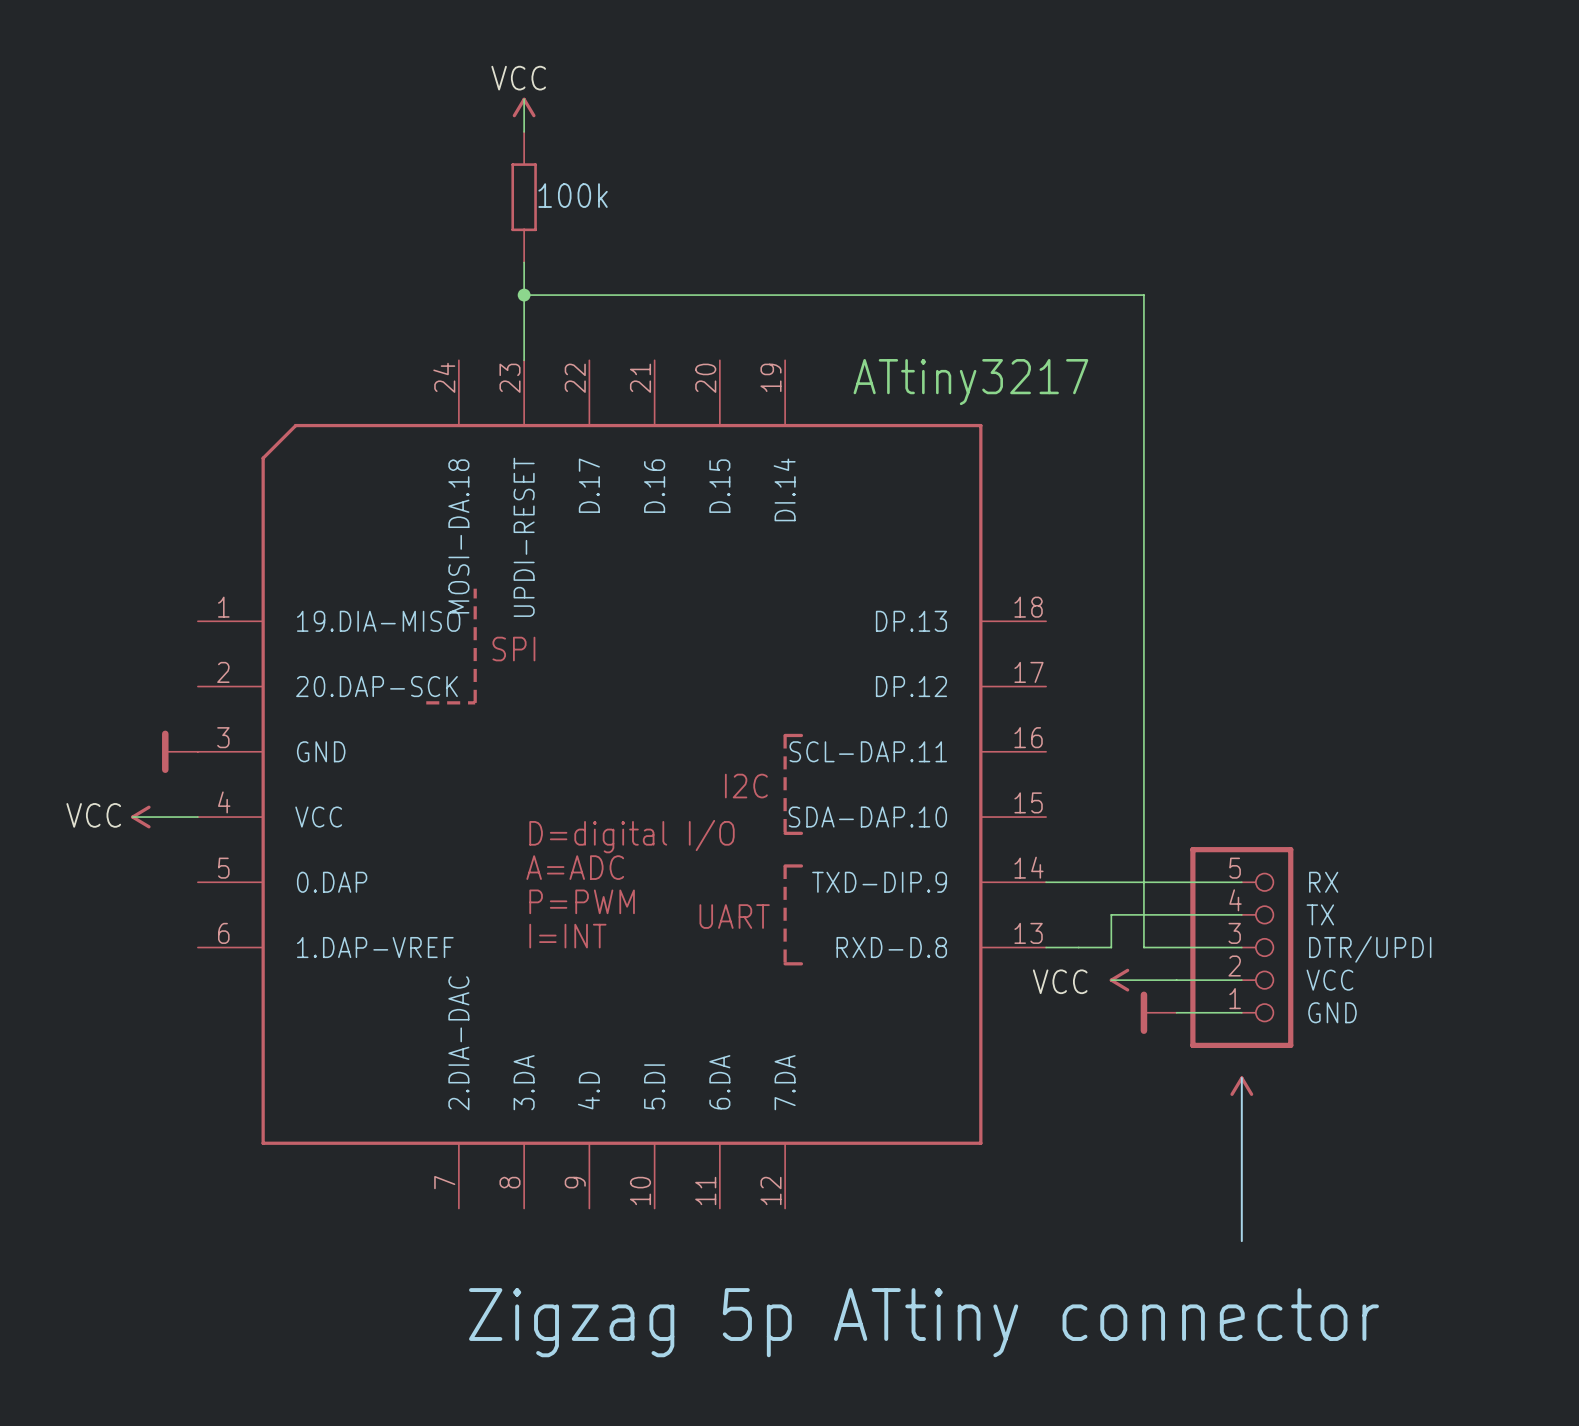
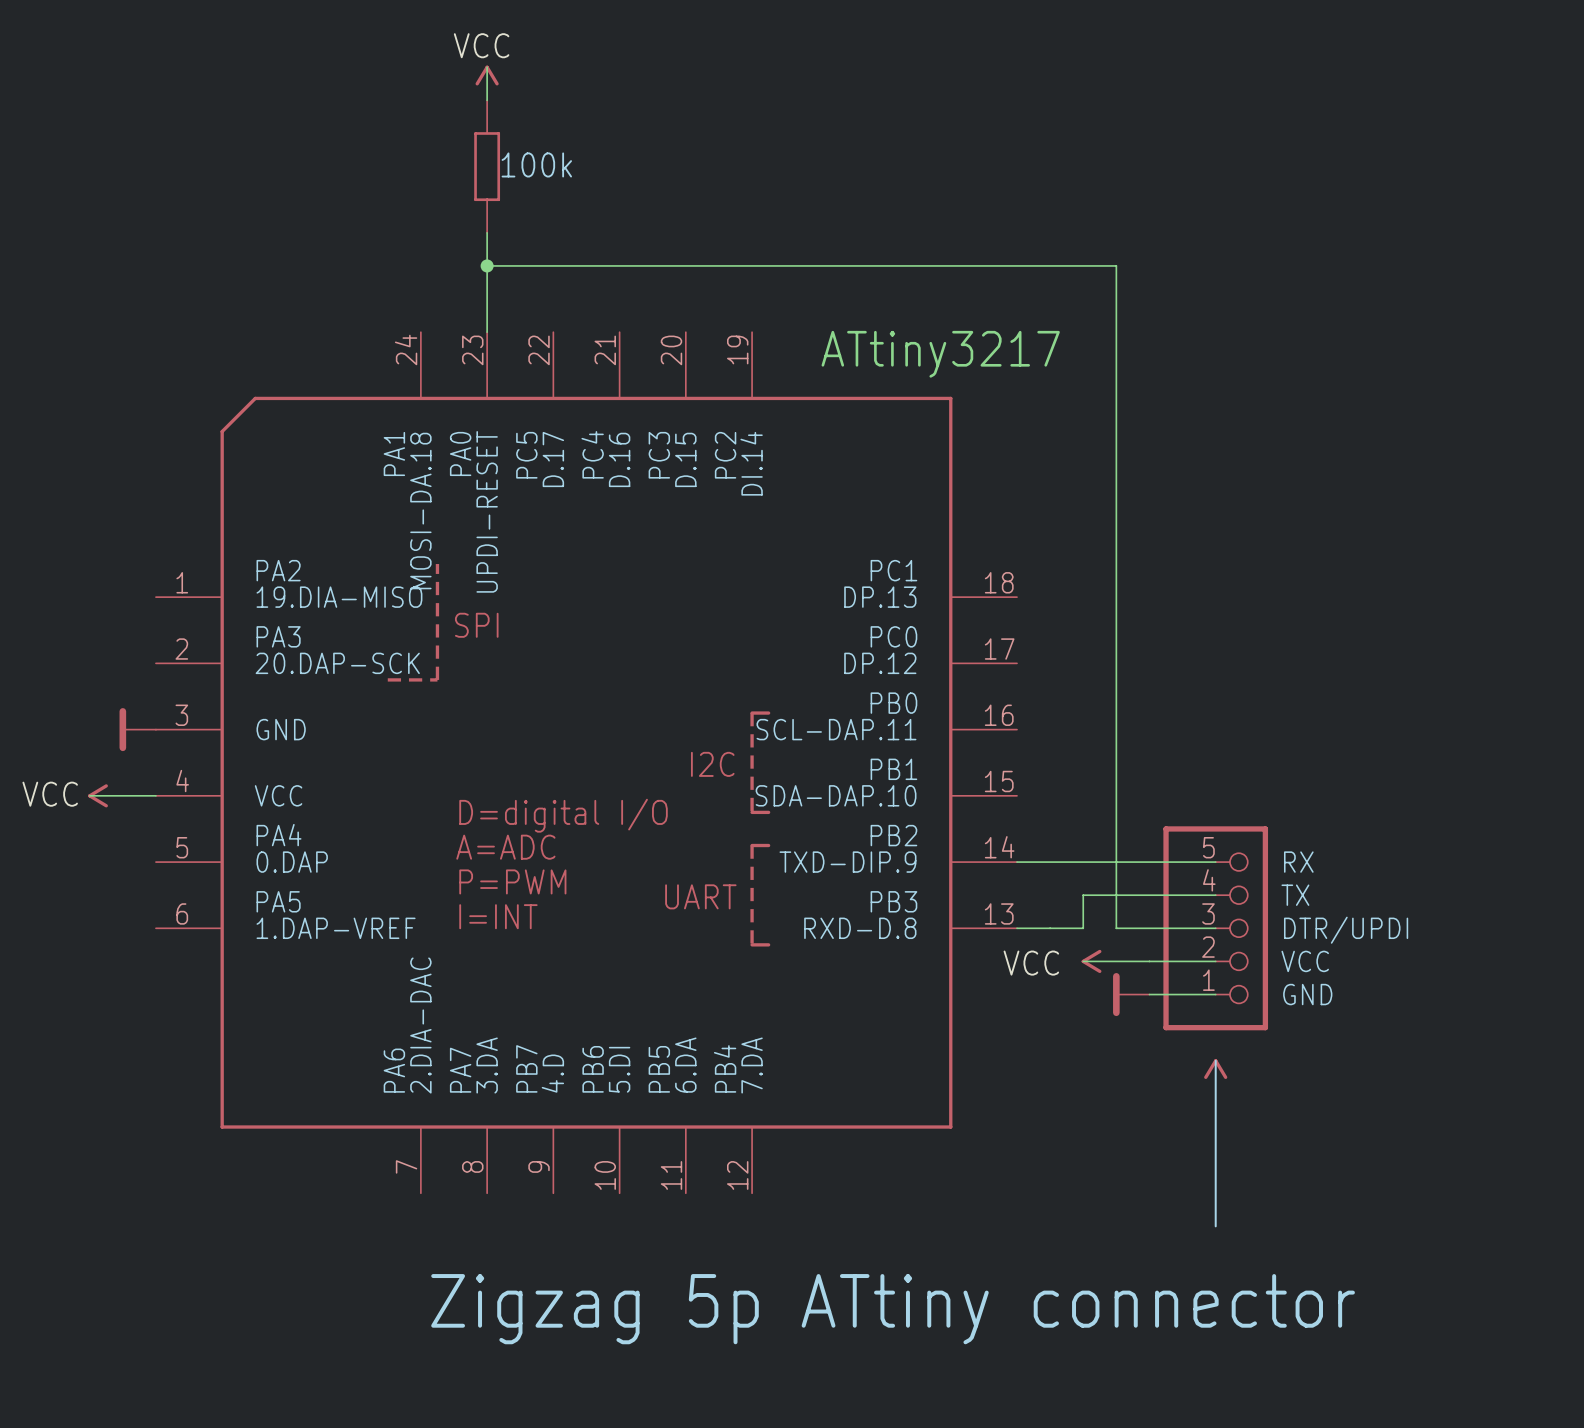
part symbol: [197, 360, 1047, 1209] -> [155, 332, 1018, 1194]

